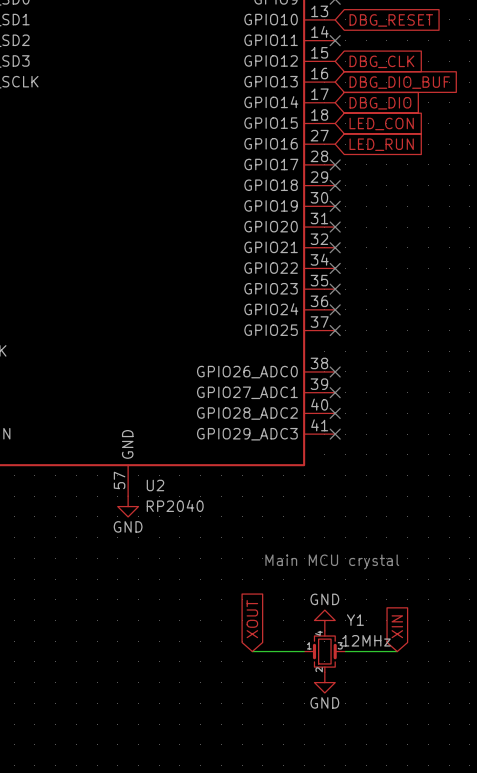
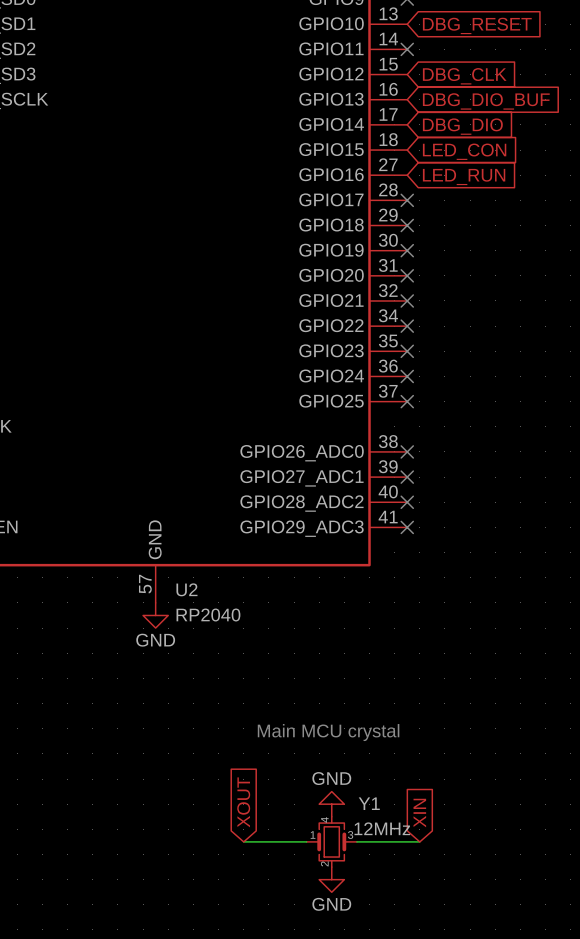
text position: Main MCU crystal (332, 561) -> Main MCU crystal (328, 732)
global label position: XOUT (252, 619) -> XOUT (243, 802)
power symbol: GND (324, 620) -> none
global label position: XIN (397, 626) -> XIN (419, 813)
wire: (252, 651) (304, 651) -> (243, 841) (306, 841)
Y1 position: (324, 651) -> (331, 841)
wire: (345, 651) (397, 651) -> (356, 841) (419, 841)
power symbol: none -> GND (331, 804)
power symbol: GND (324, 682) -> none
power symbol: none -> GND (331, 879)

